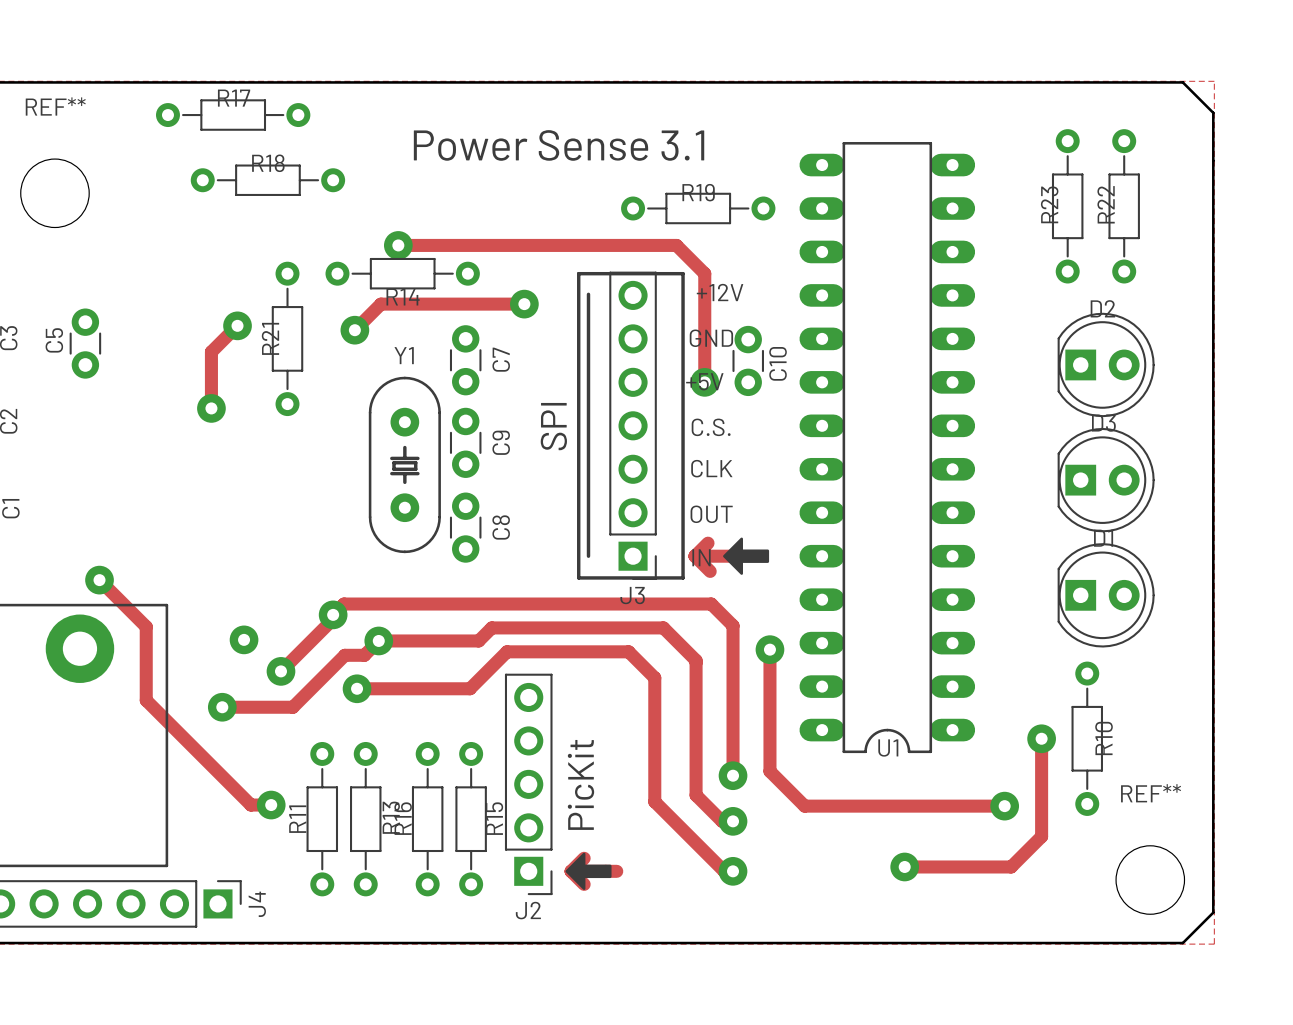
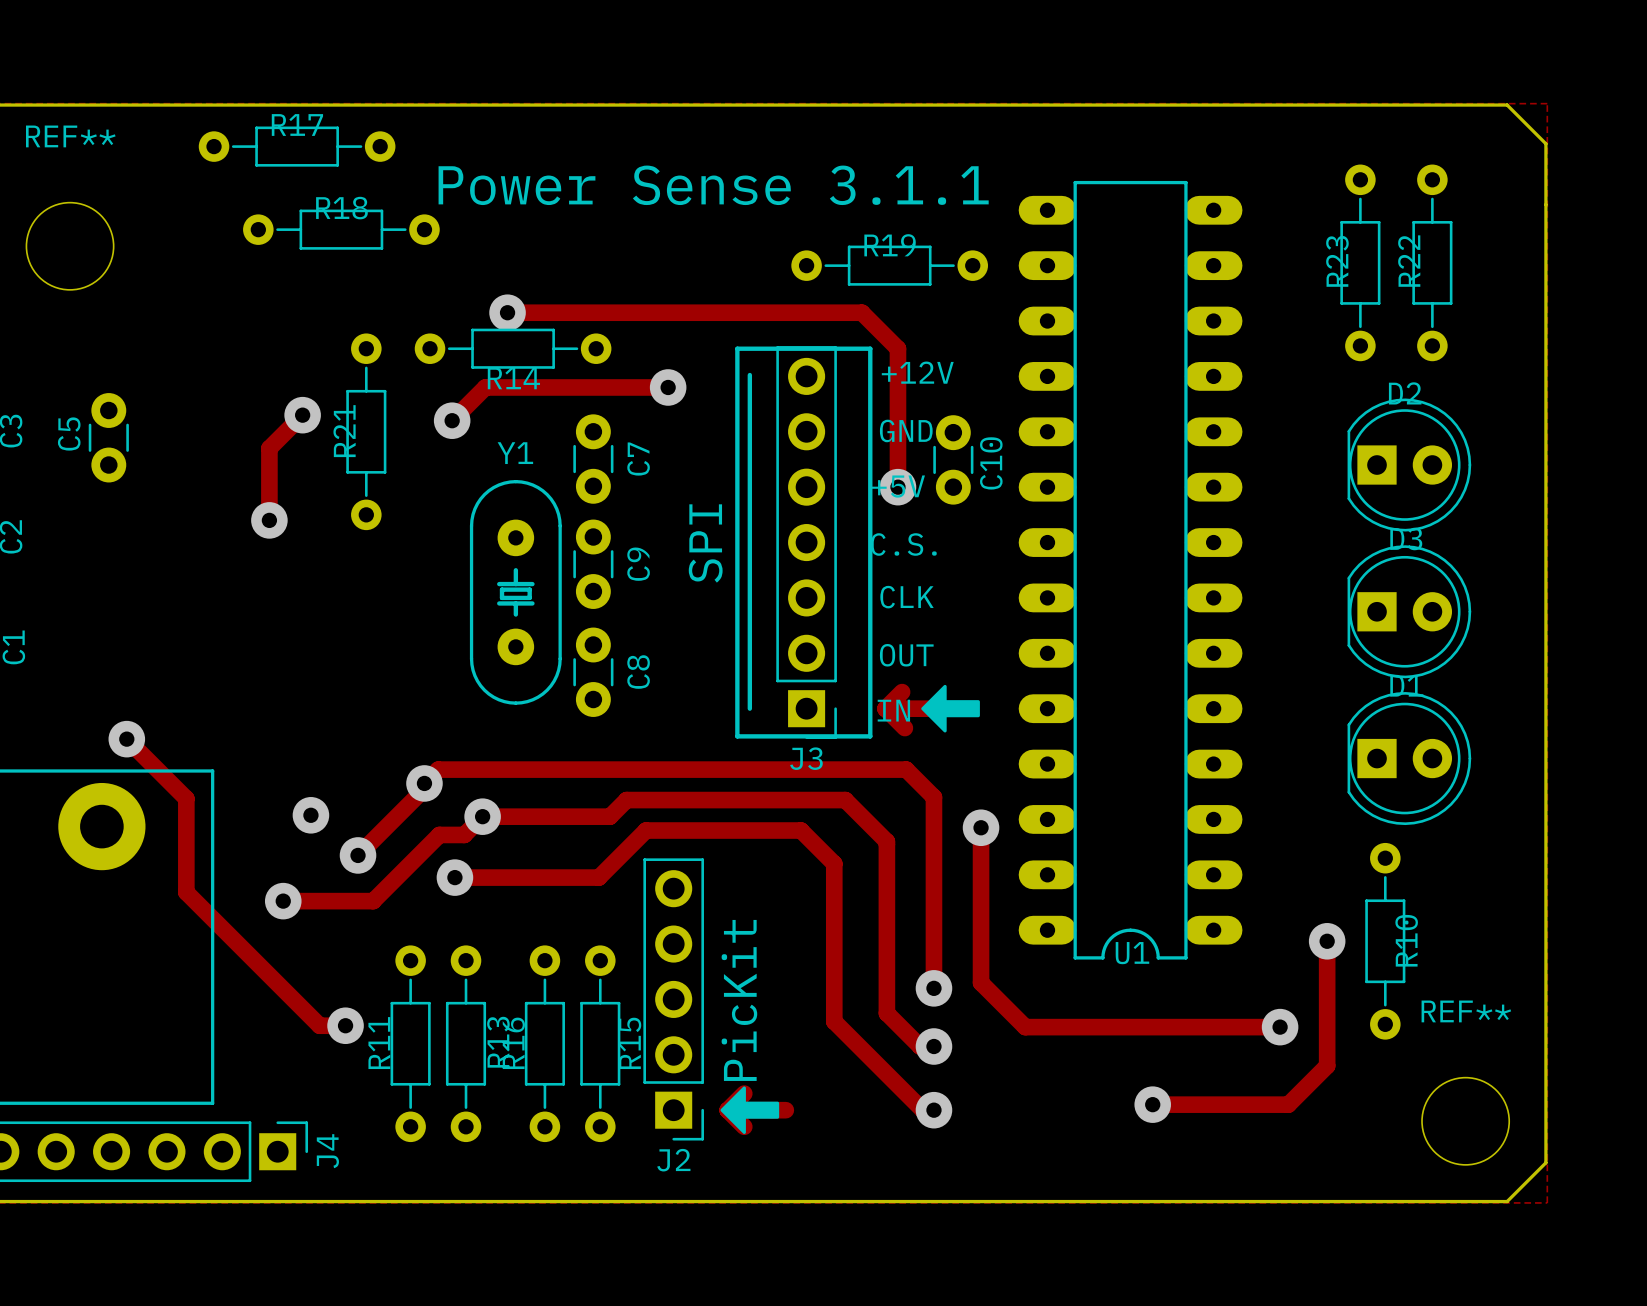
text: Power Sense 3.1 (559, 145) -> Power Sense 3.1.1 (713, 185)

